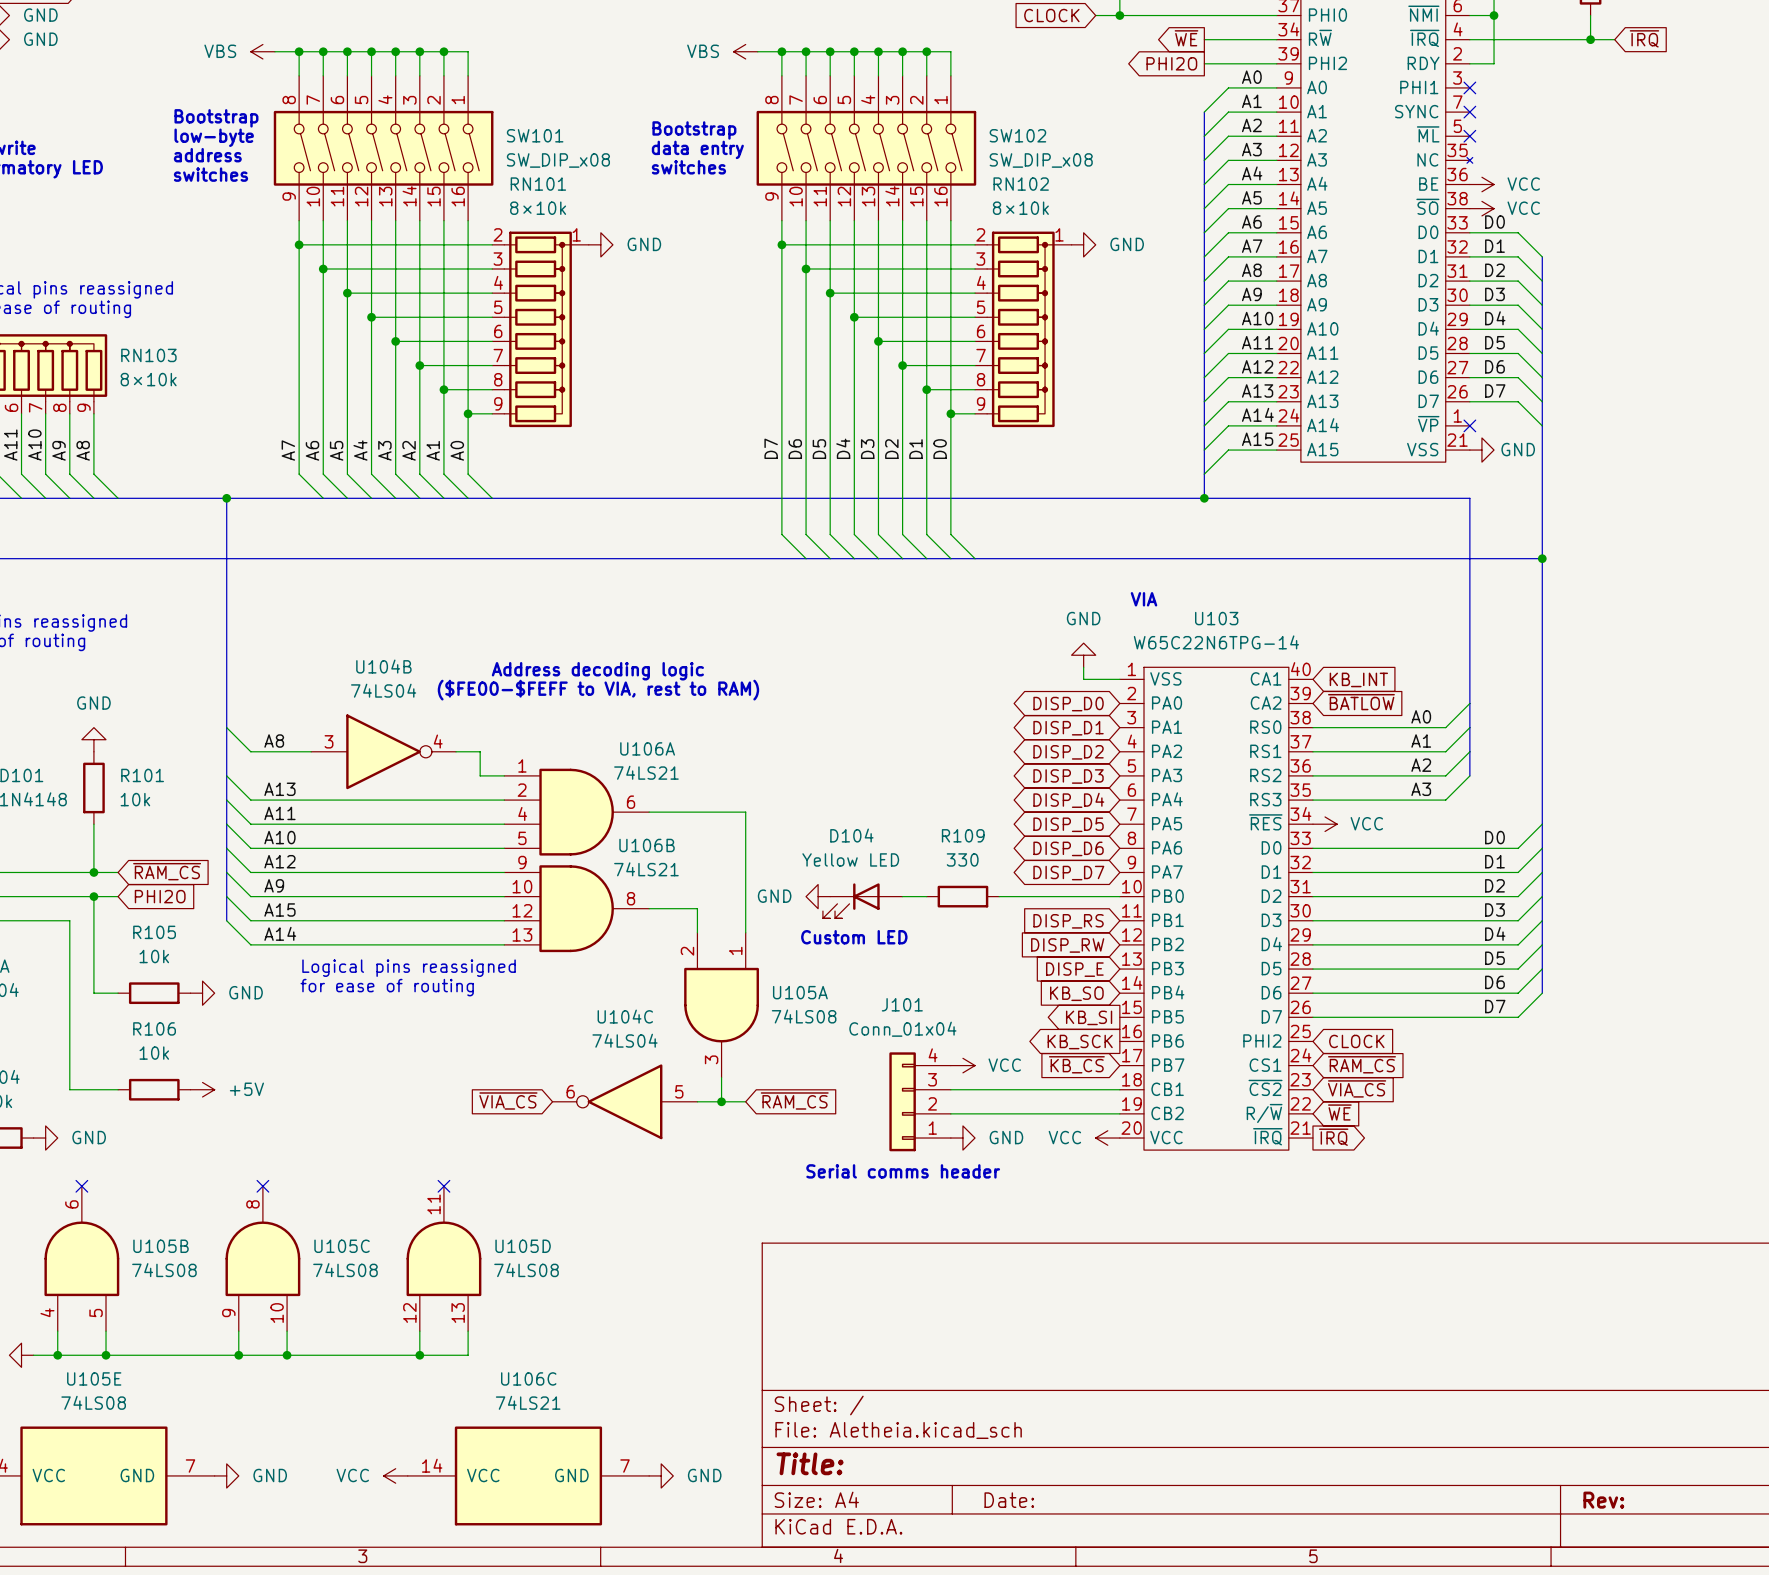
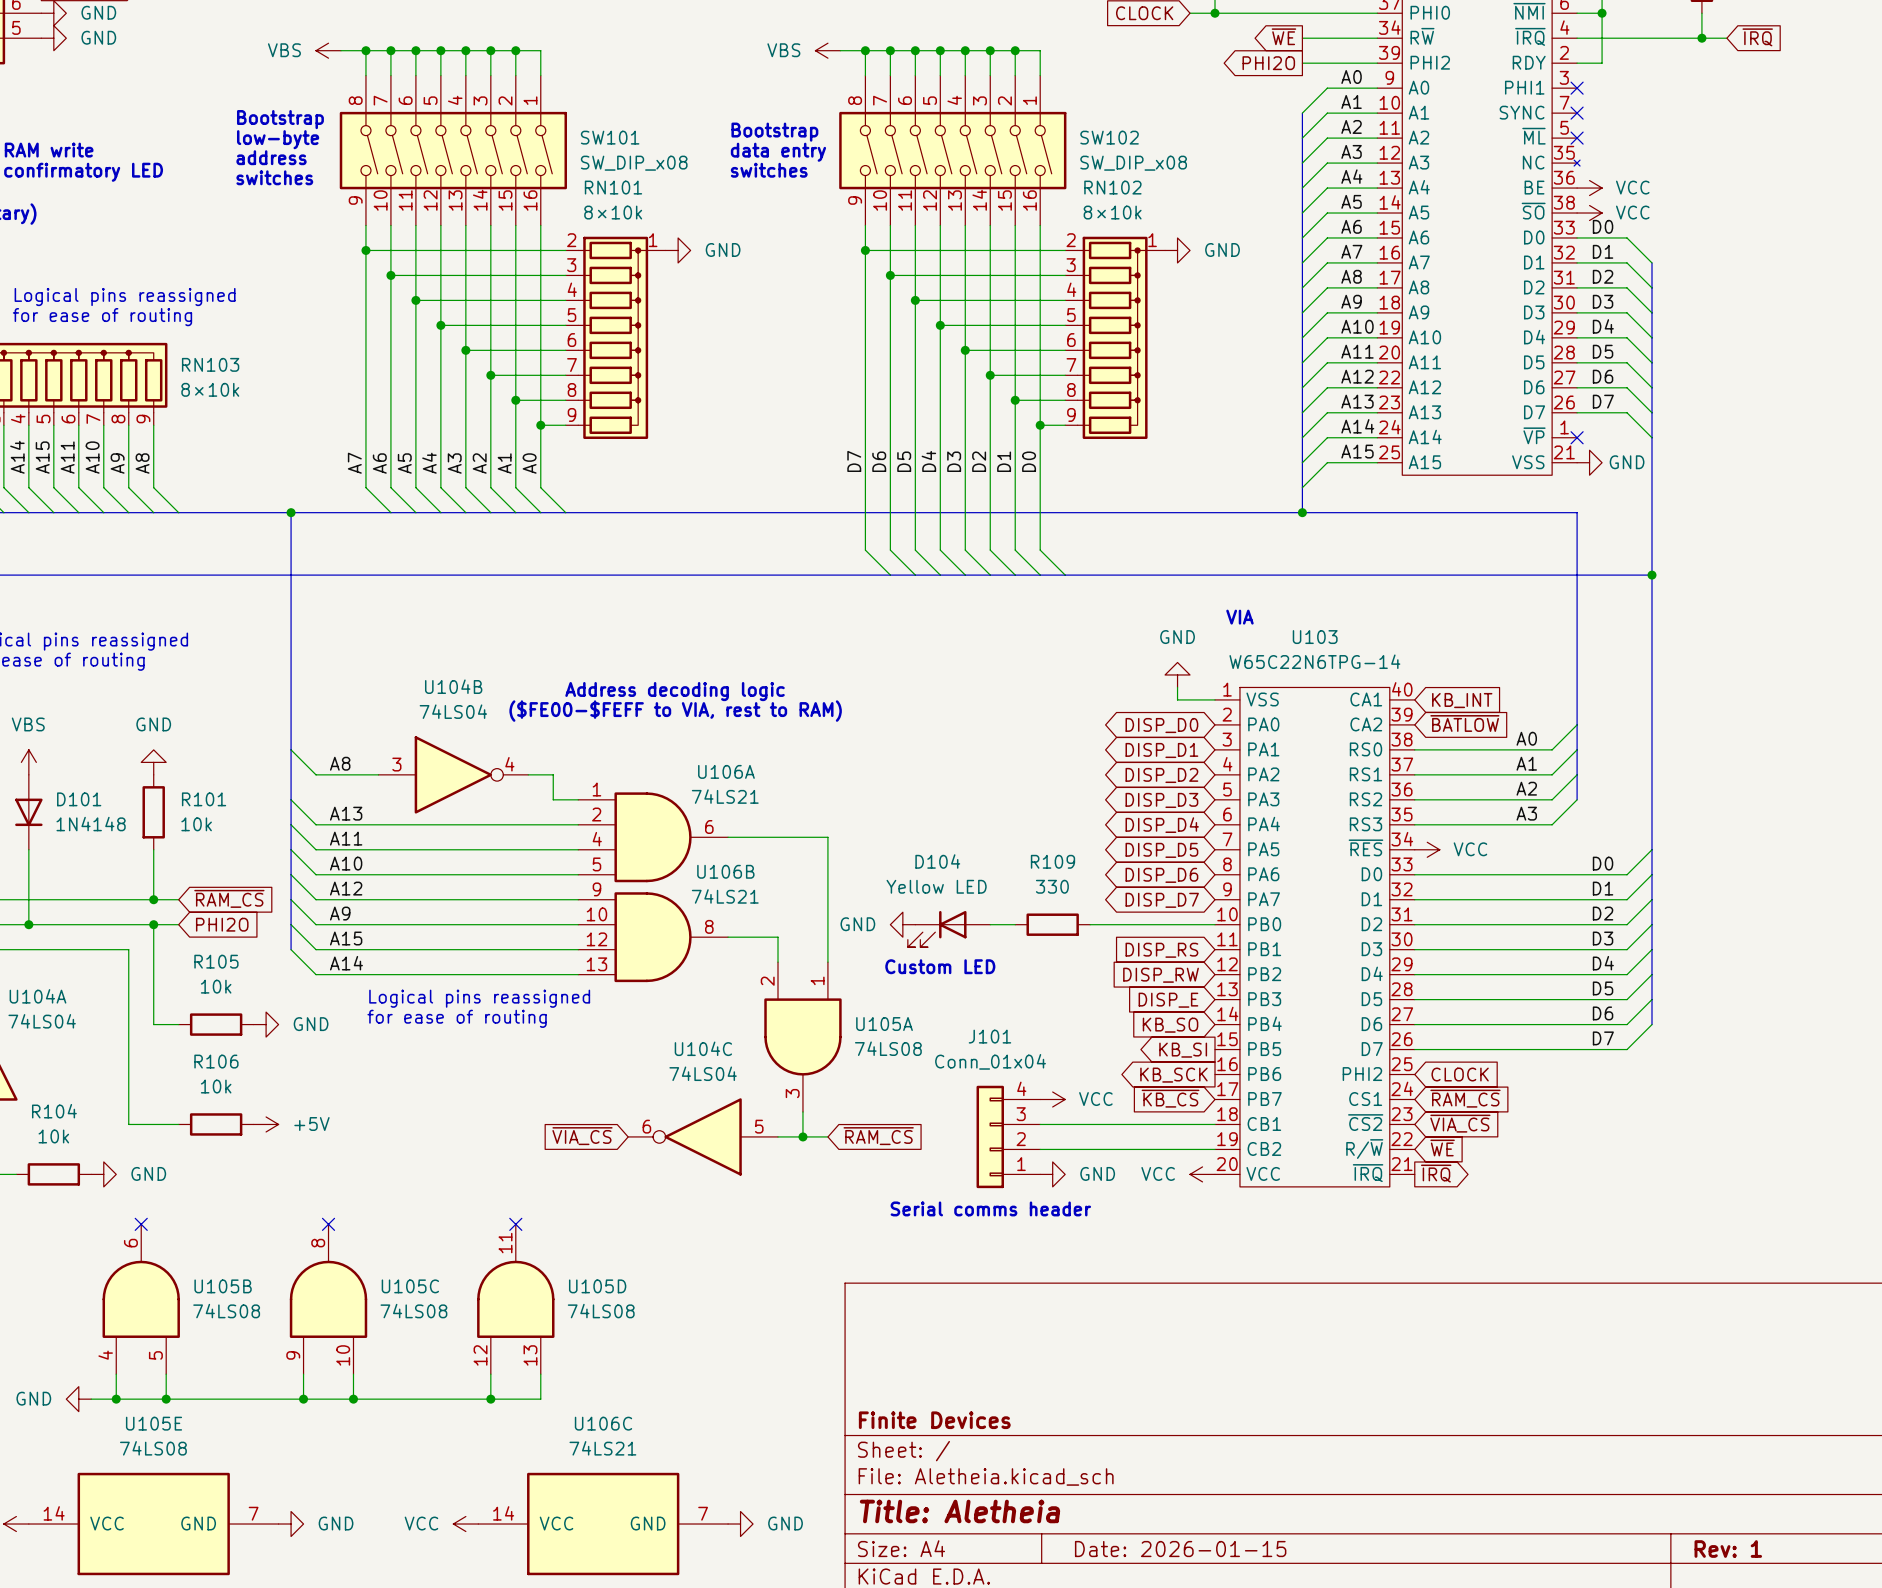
title block: none -> Finite Devices (934, 1420)
title block: Title: (810, 1463) -> Title: Aletheia (959, 1511)
title block: Date: (1009, 1500) -> Date: 2026-01-15 (1180, 1549)
title block: Rev: (1603, 1500) -> Rev: 1 (1728, 1549)

